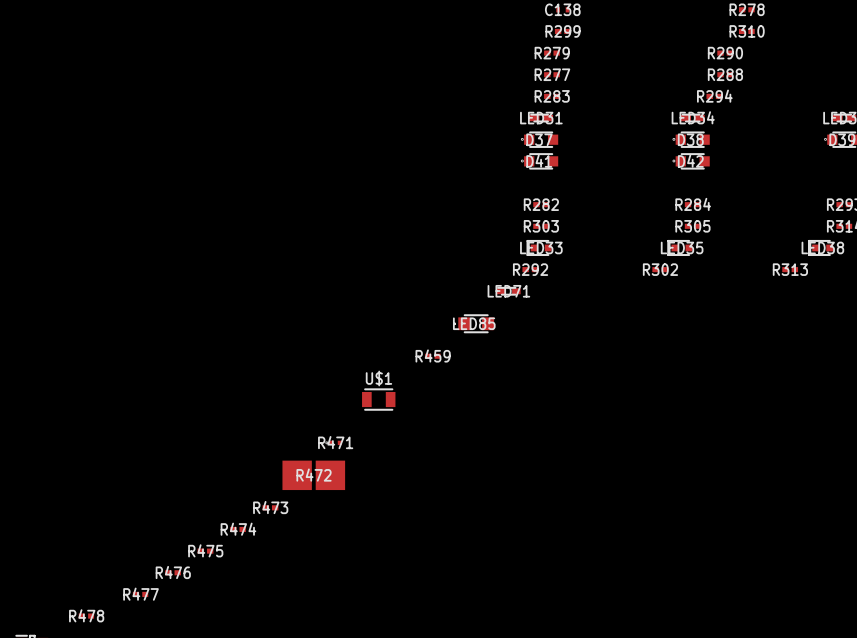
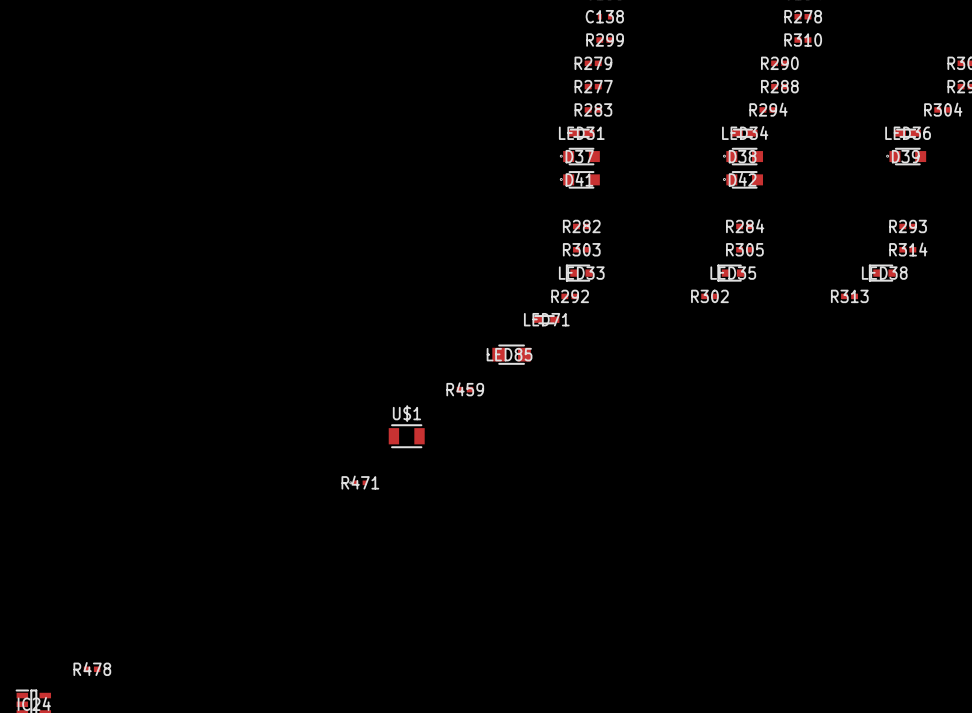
R472: (313, 475) -> none
R473: (270, 507) -> none
R474: (237, 529) -> none
R475: (205, 551) -> none
R476: (173, 572) -> none
R477: (140, 594) -> none

